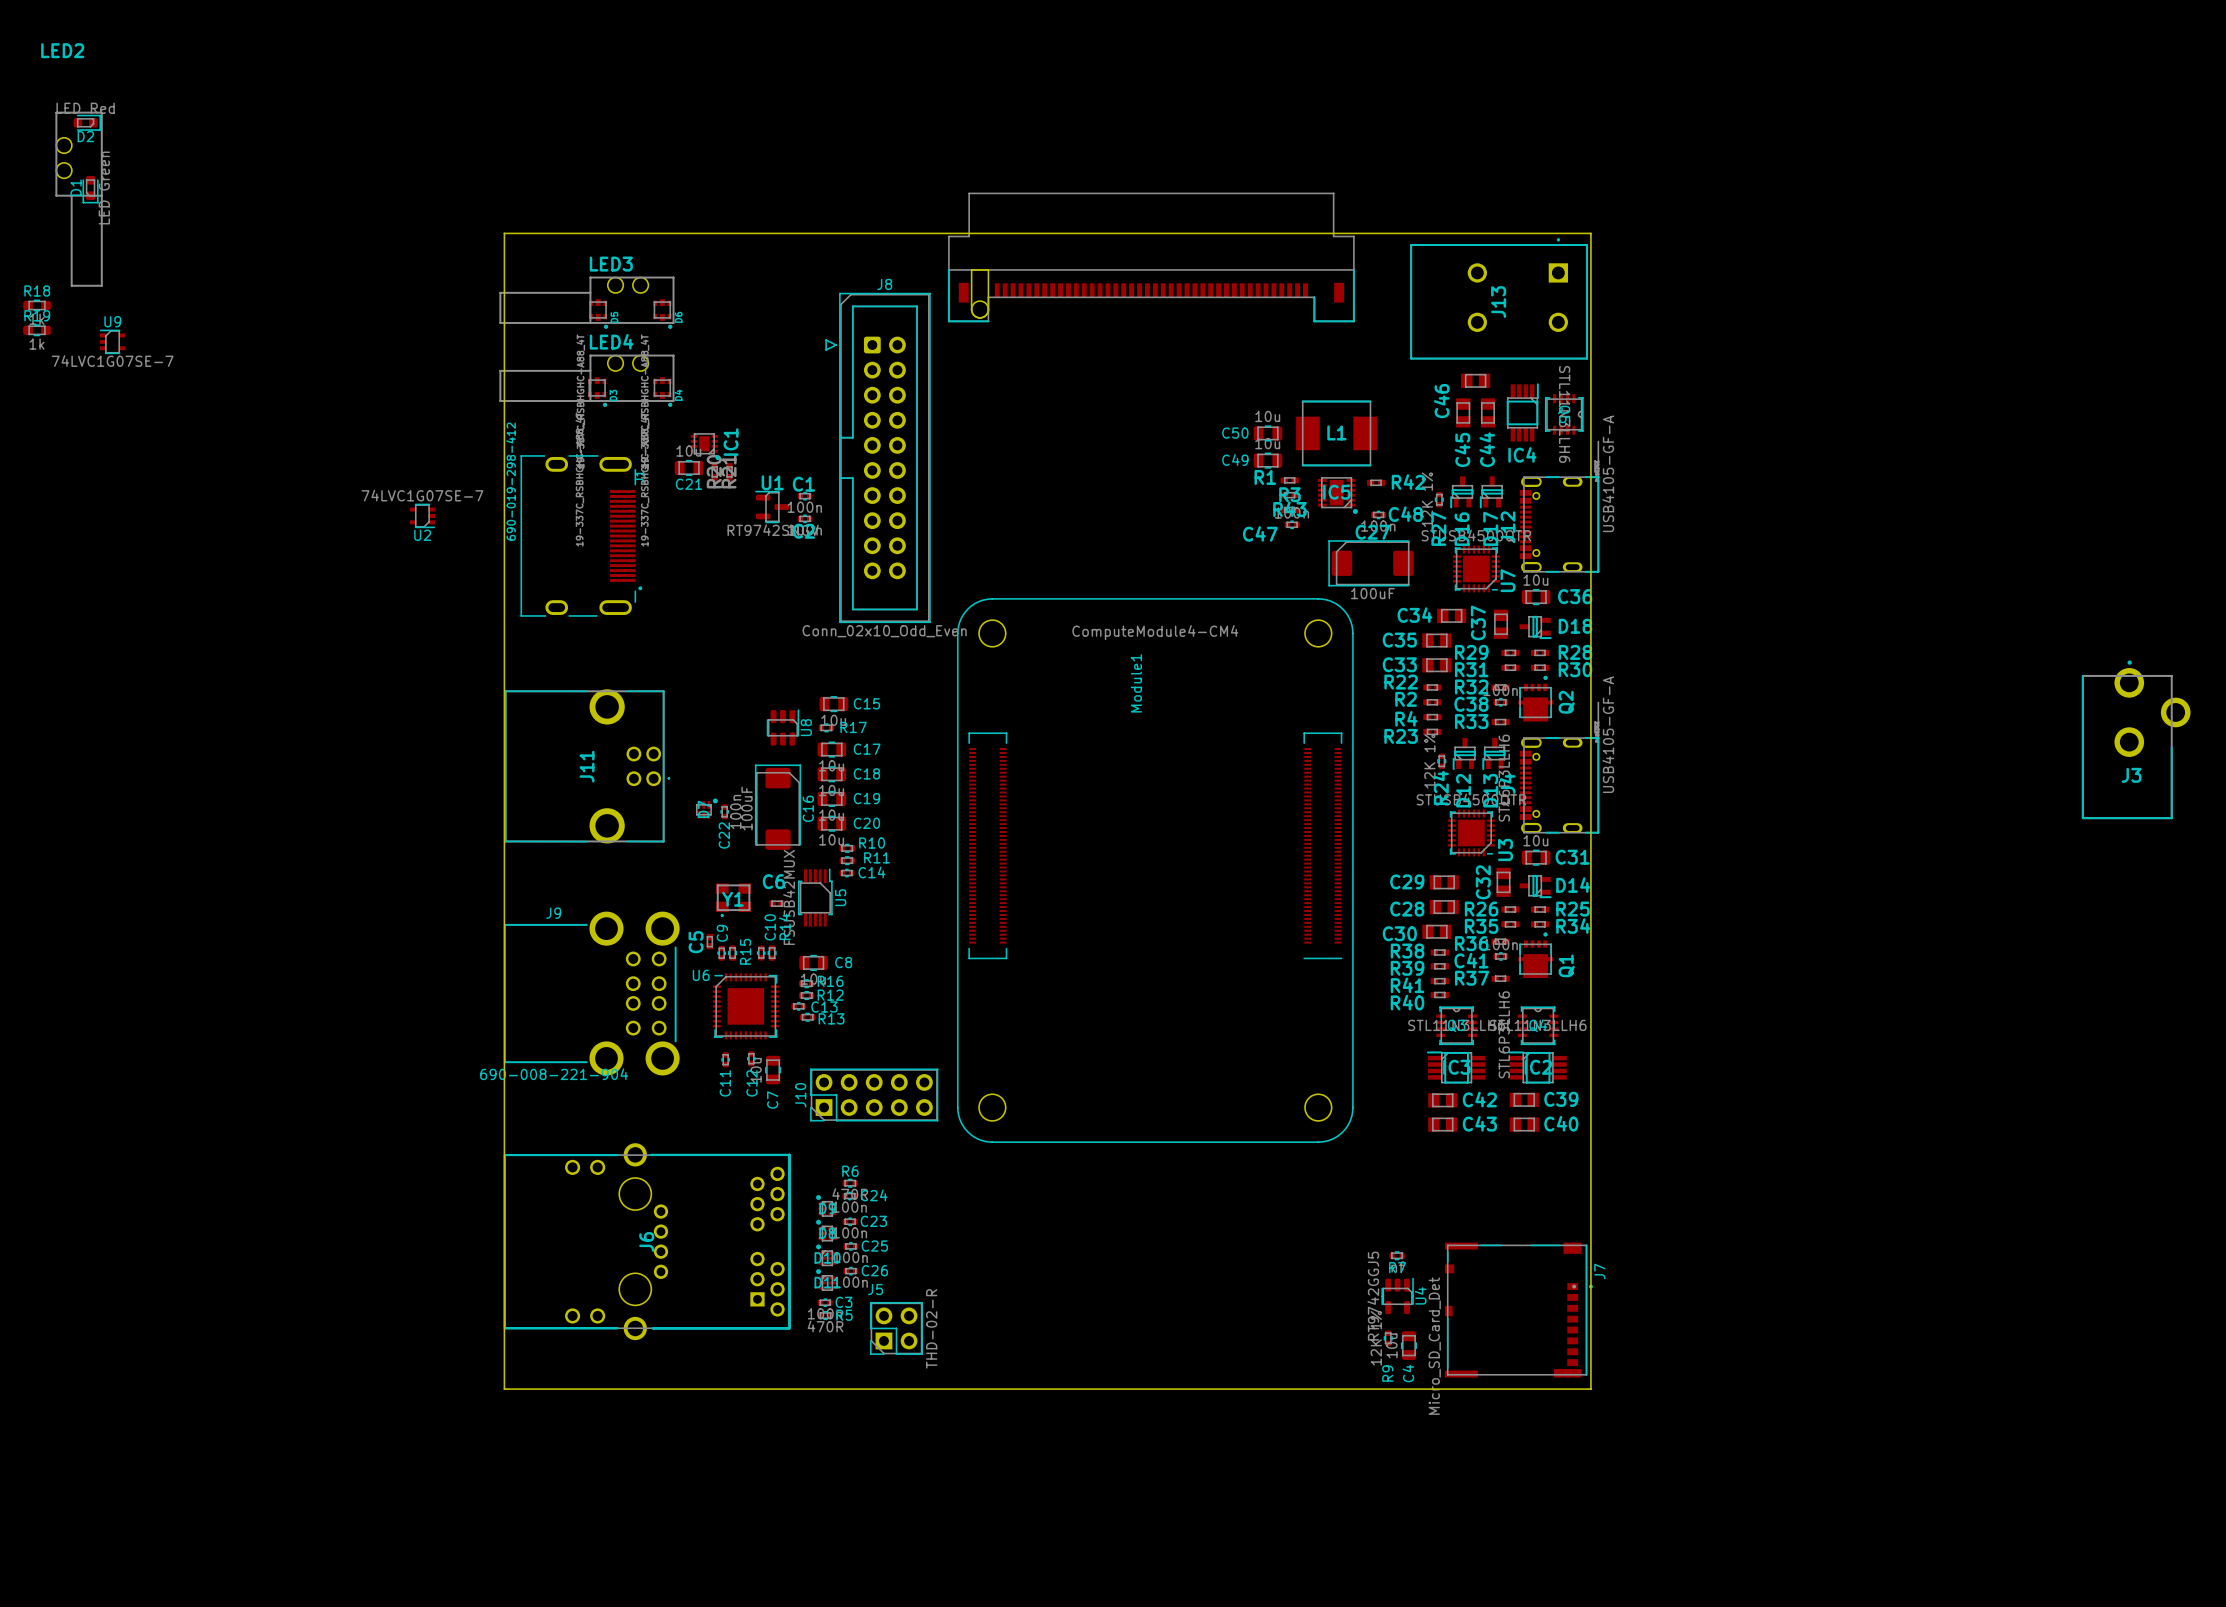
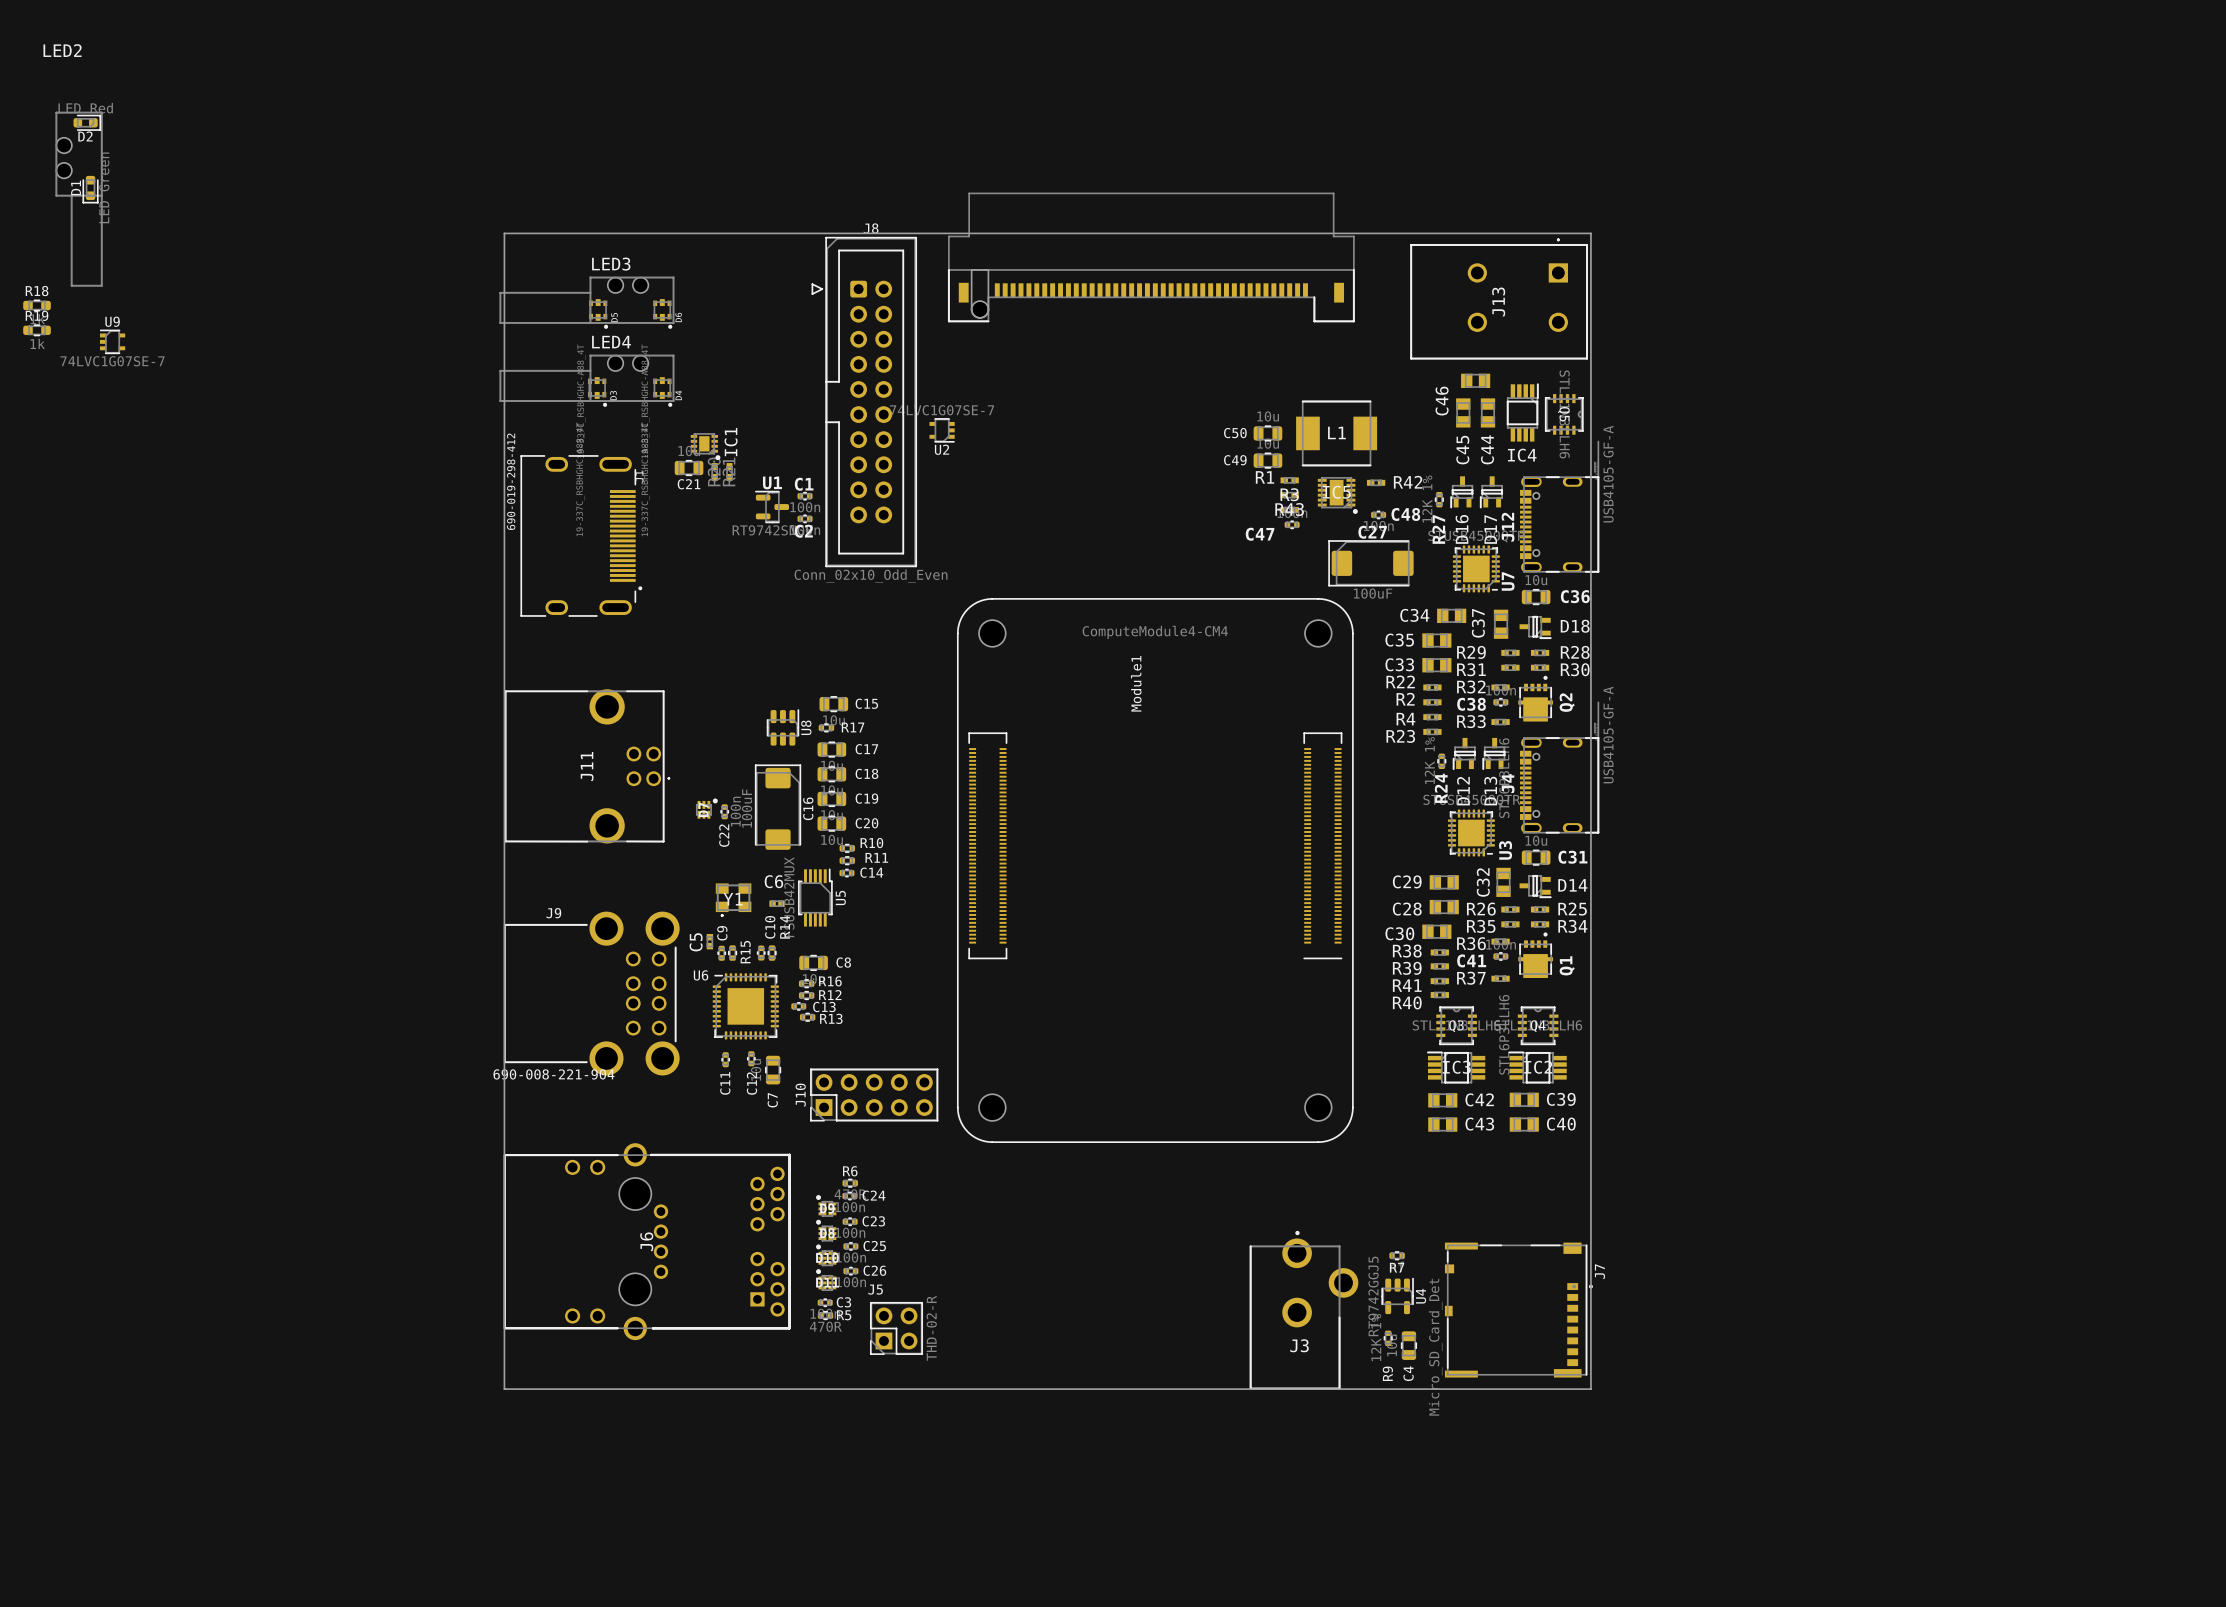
J8 position: (878, 457) -> (864, 402)
U2 position: (422, 515) -> (942, 430)
J3 position: (2136, 739) -> (1304, 1310)

